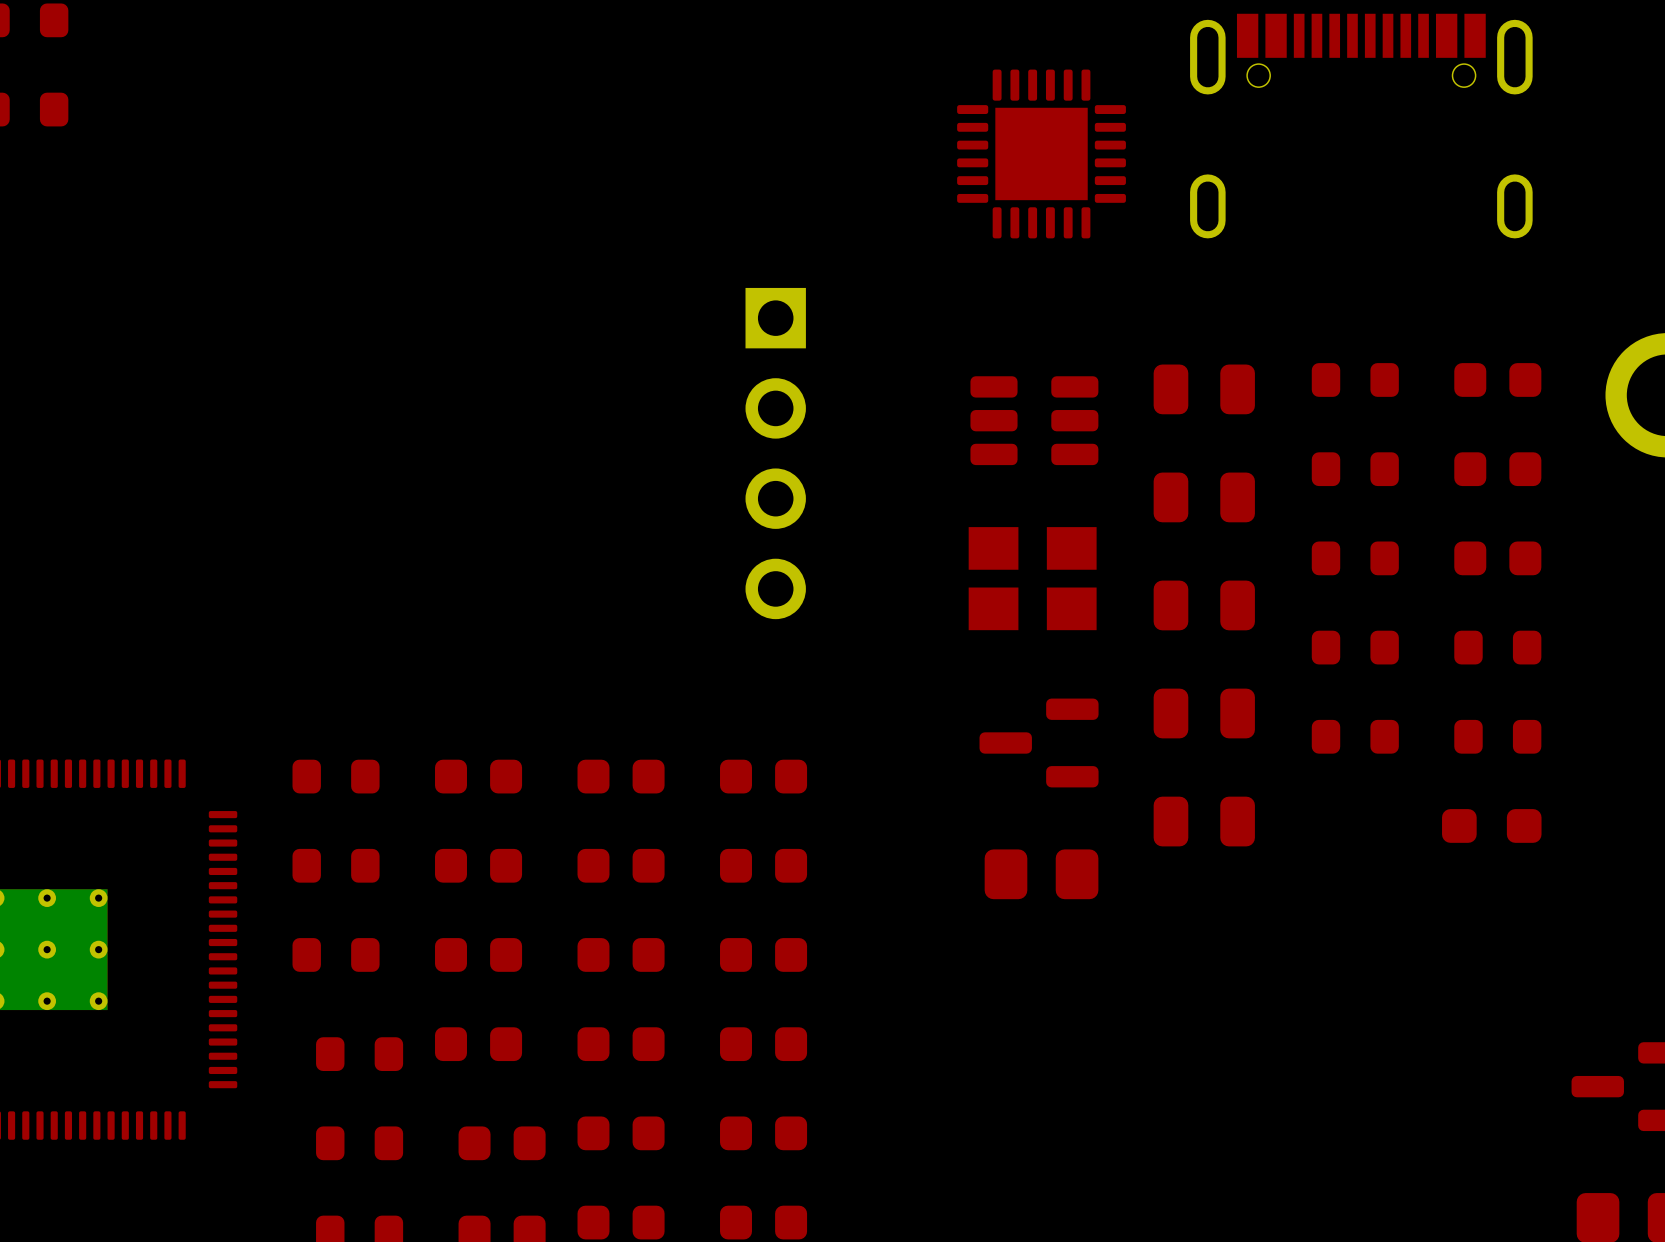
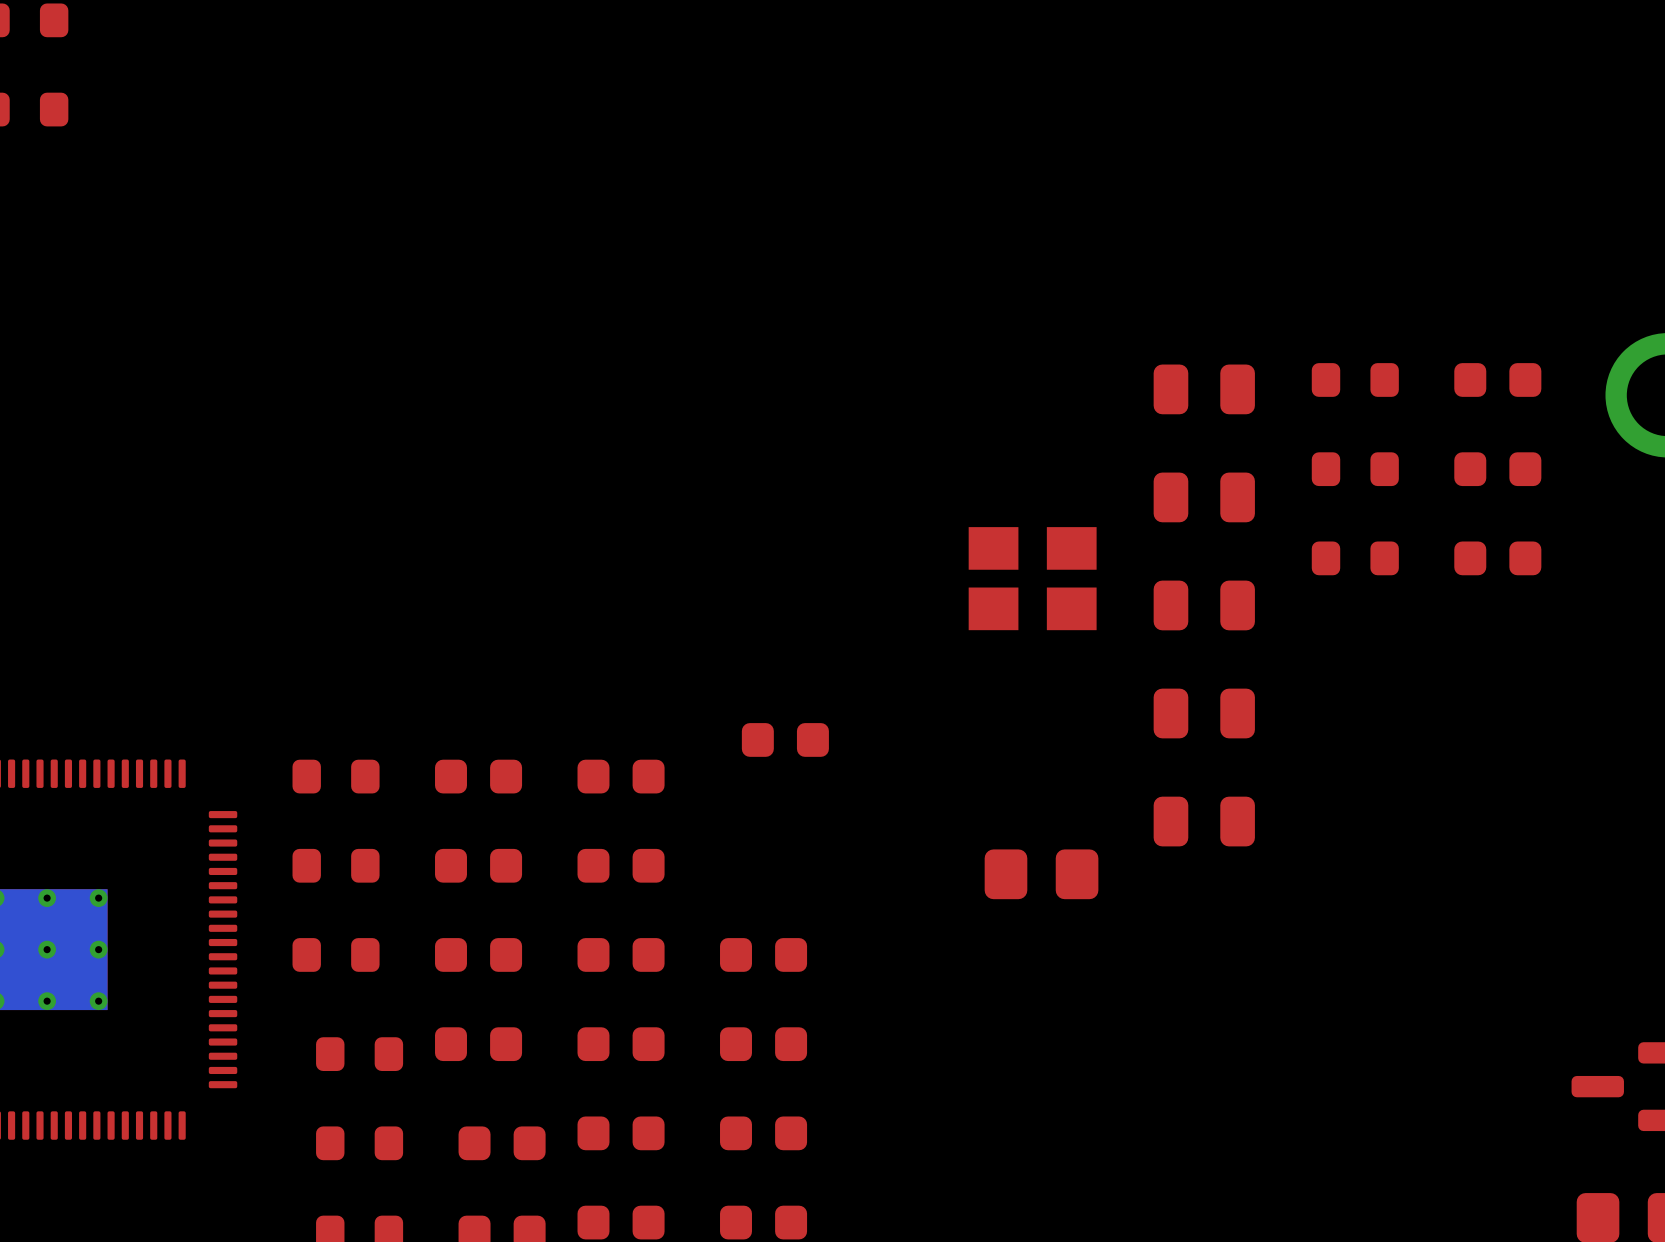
part: (1361, 126) -> none
part: (1041, 153) -> none
part: (1034, 420) -> none
part: (775, 453) -> none
part: (1355, 647) -> none
part: (1497, 647) -> none
part: (1355, 736) -> none
part: (1497, 736) -> none
part: (1039, 742) -> none
part position: (763, 776) -> (785, 739)
part: (1491, 825) -> none
part: (763, 865) -> none

